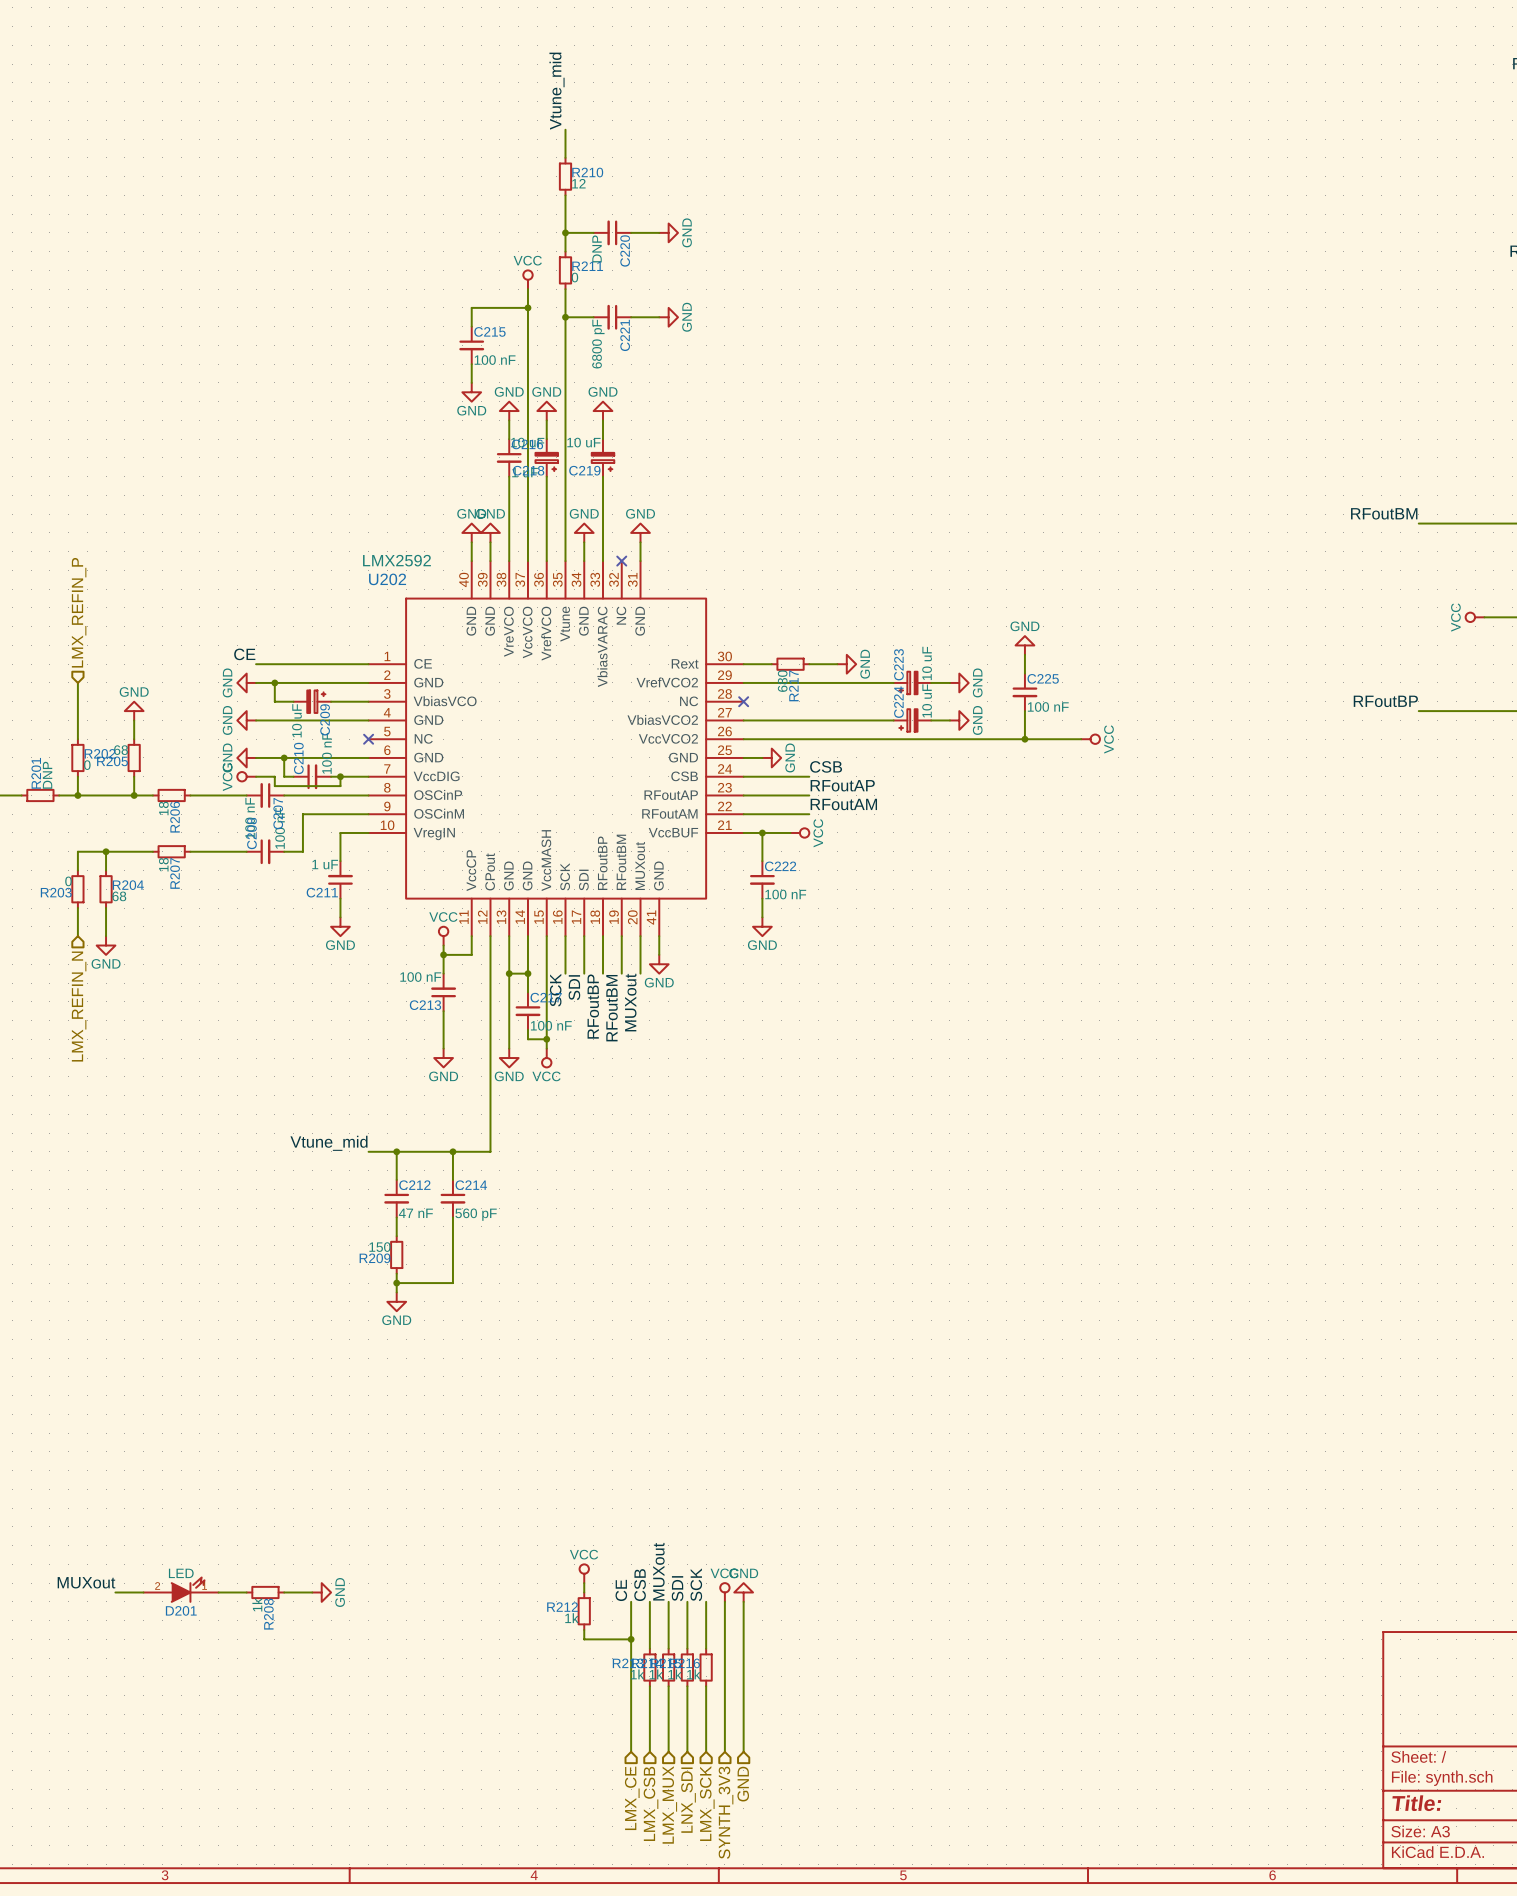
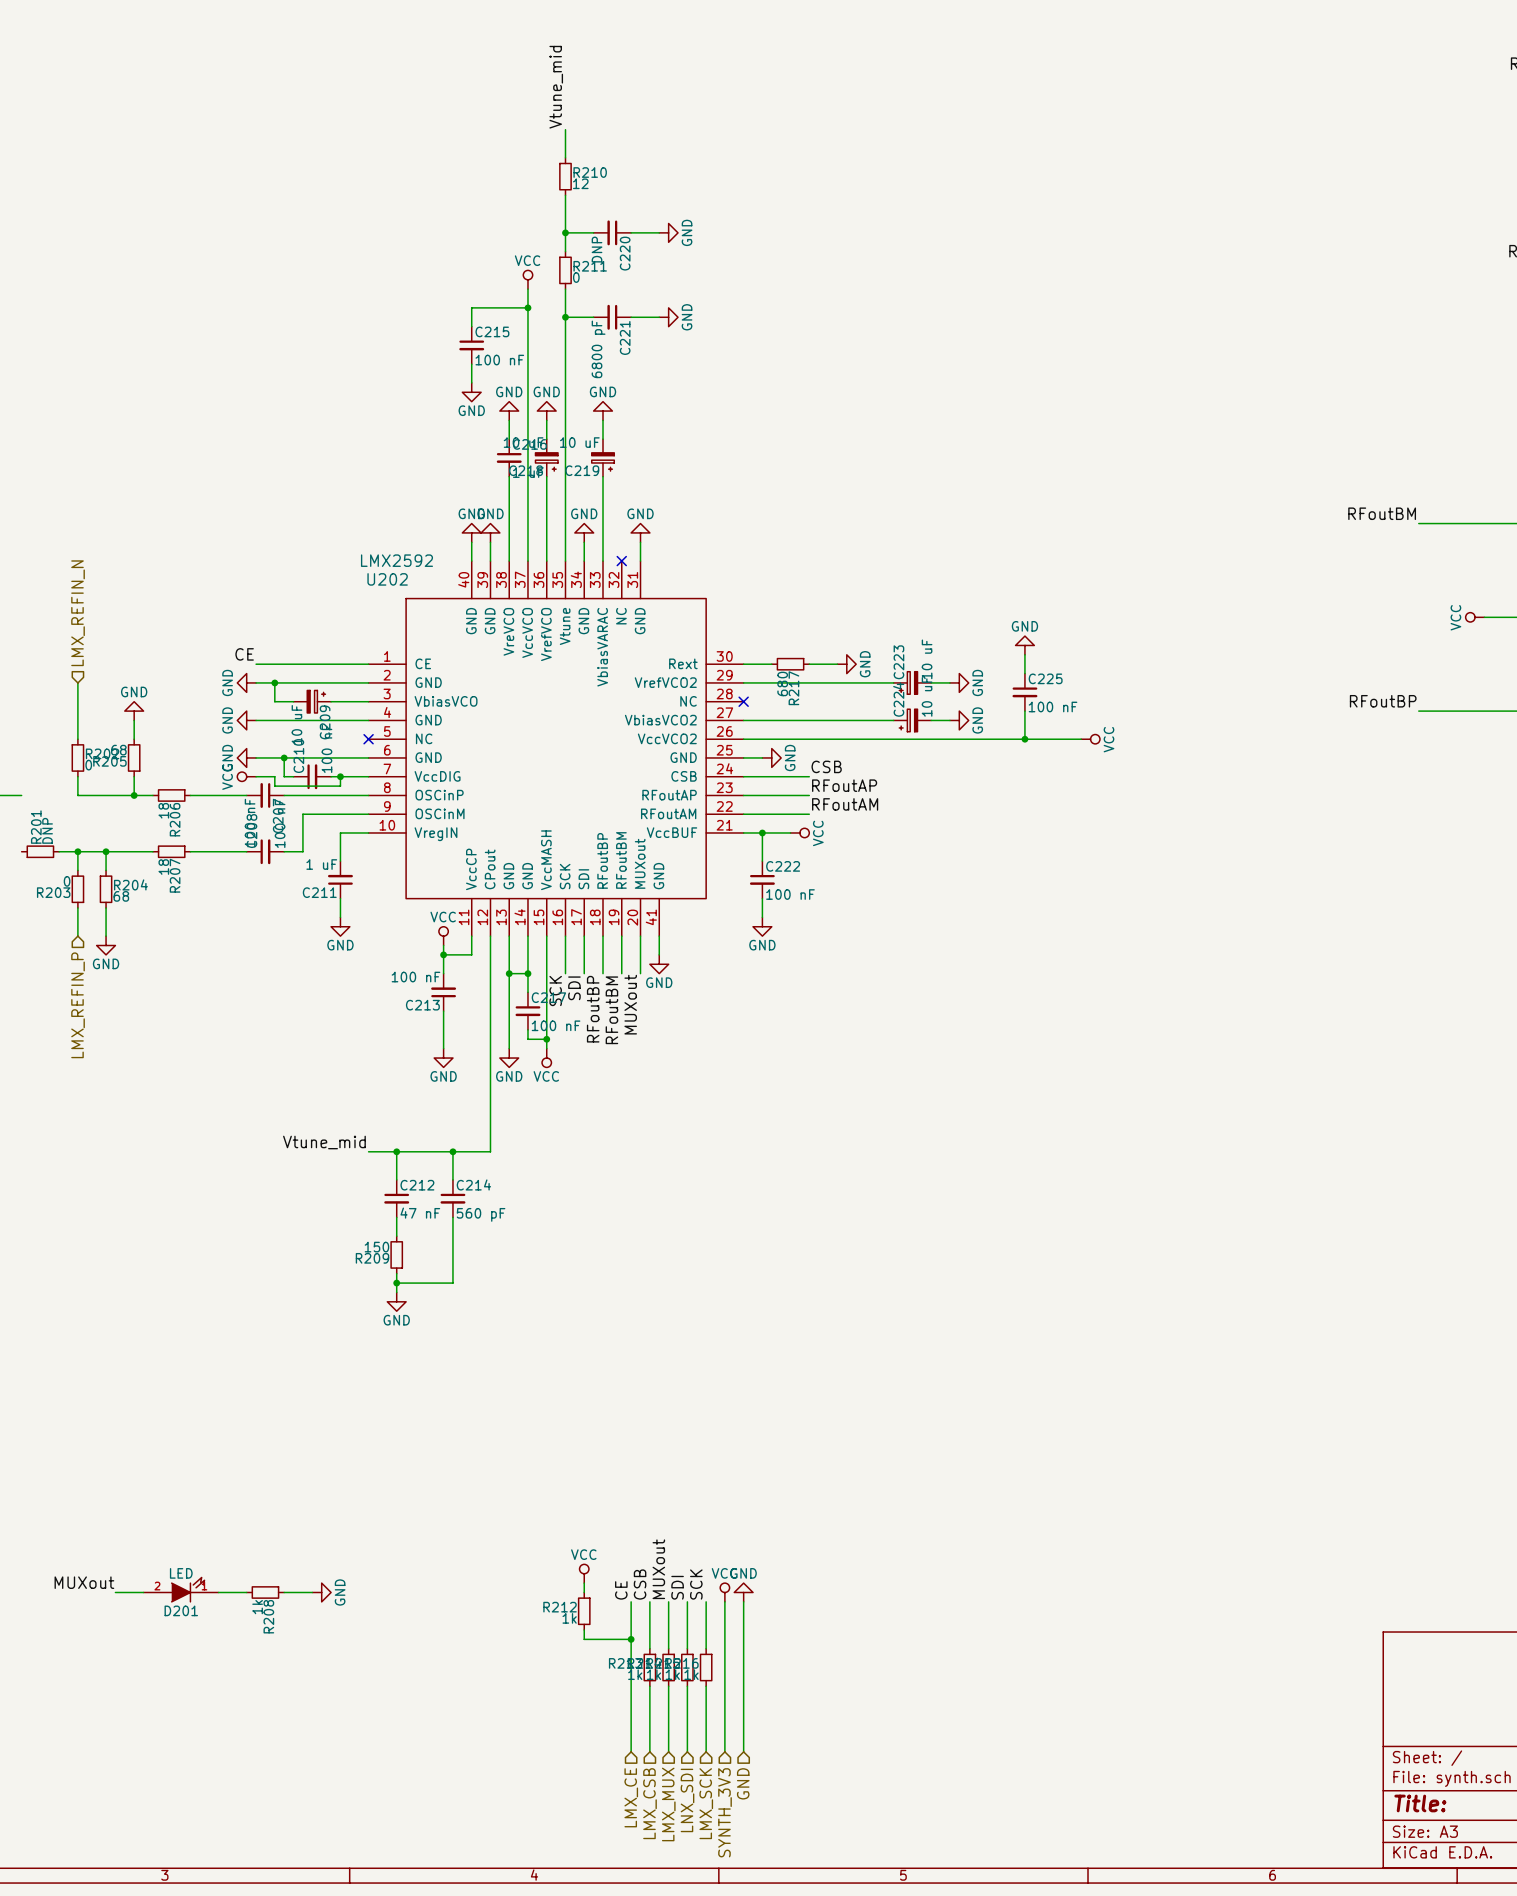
hierarchical label: LMX_REFIN_P (79, 612) -> LMX_REFIN_N (78, 613)
R201 position: (40, 795) -> (40, 851)
wire: (59, 795) (77, 795) -> (59, 851) (77, 851)
junction: (77, 795) -> none
junction: none -> (77, 851)
hierarchical label: LMX_REFIN_N (79, 1006) -> LMX_REFIN_P (78, 1005)

